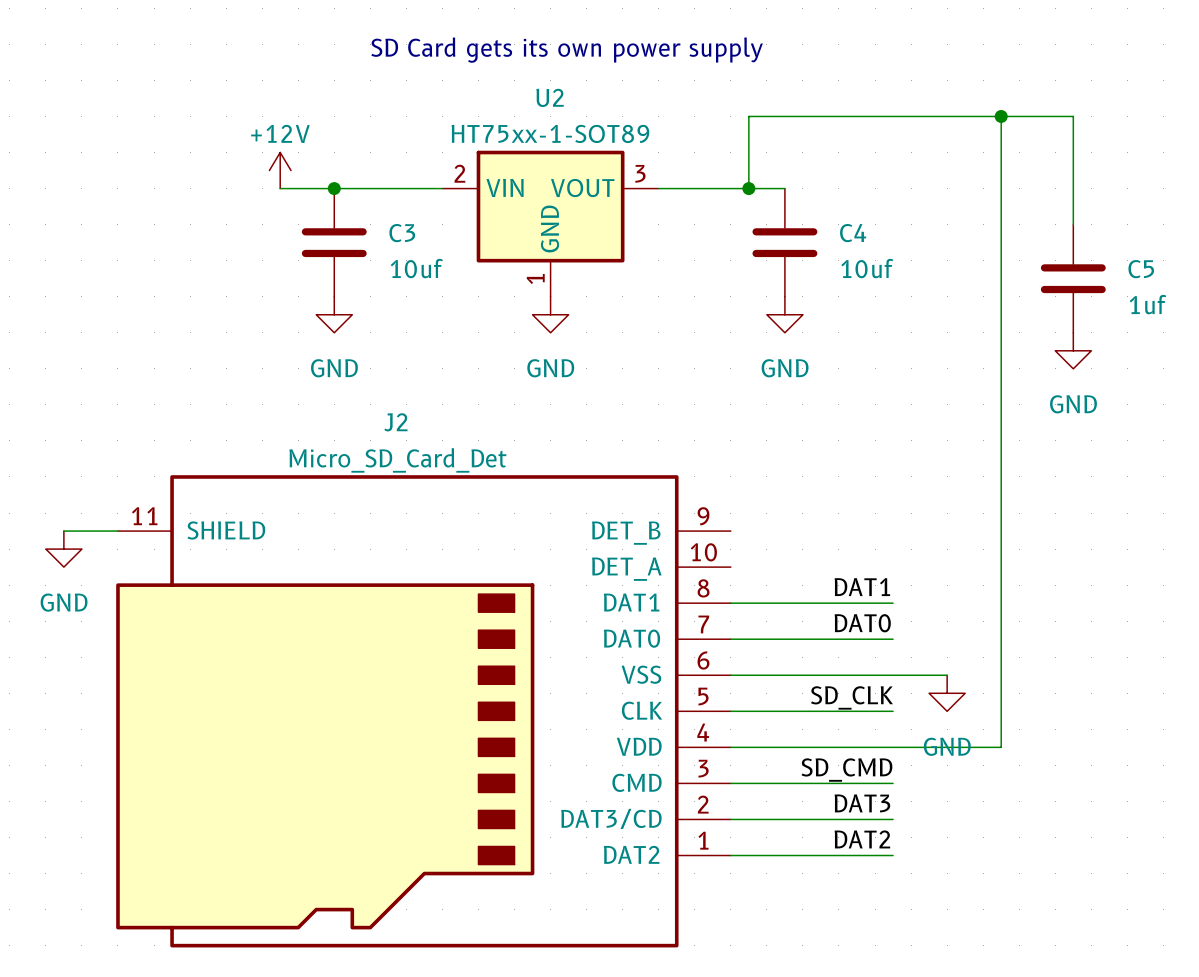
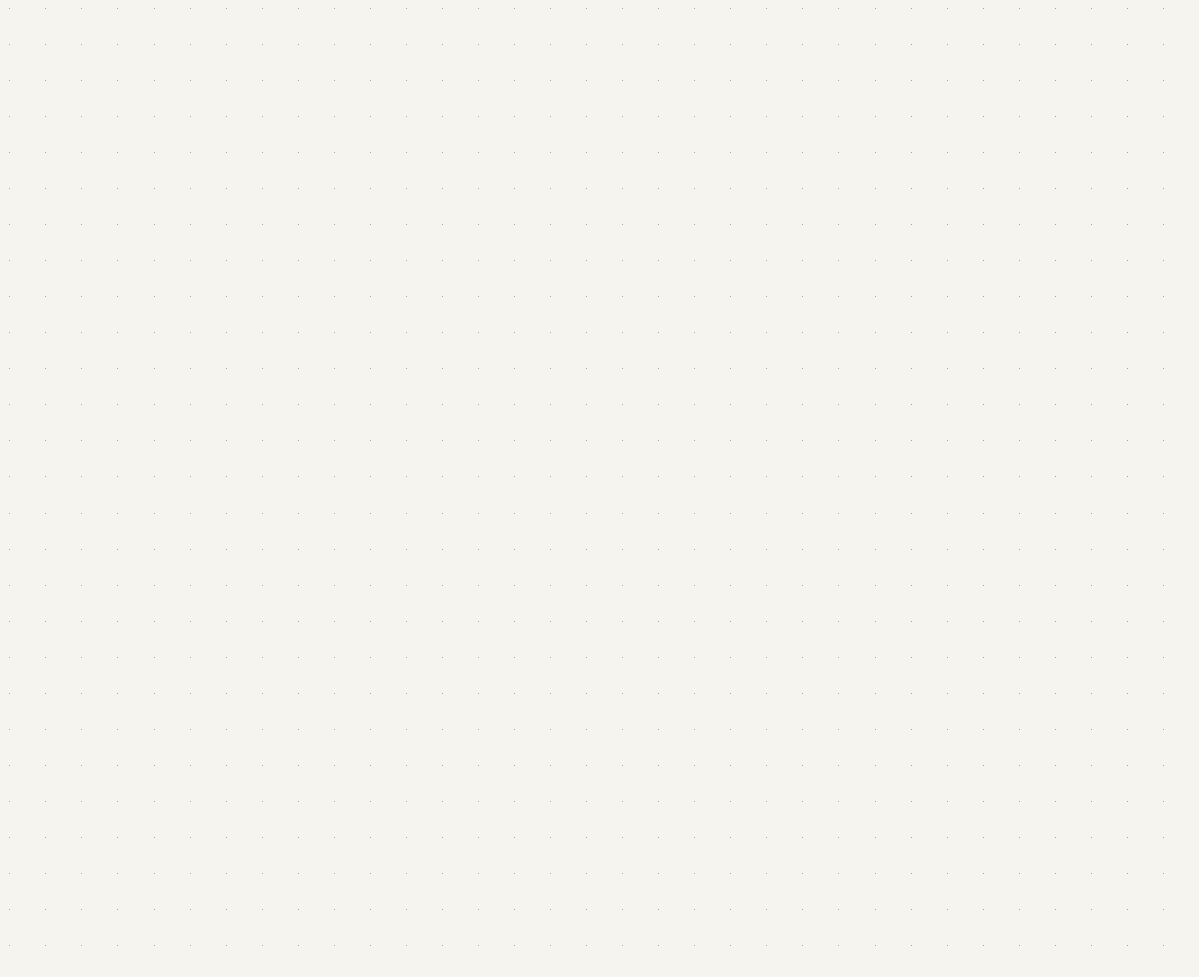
text: SD Card gets its own power supply (567, 50) -> none
wire: (1001, 116) (1001, 747) (730, 747) -> none
junction: (1001, 116) -> none
power symbol: +12V (280, 170) -> none
wire: (280, 188) (442, 188) -> none
junction: (334, 188) -> none
wire: (658, 188) (784, 188) -> none
wire: (748, 188) (748, 116) (1073, 116) (1073, 224) -> none
junction: (748, 188) -> none
U2: HT75xx-1-SOT89 (550, 223) -> none
C3: 10uf (334, 242) -> none
C4: 10uf (784, 242) -> none
C5: 1uf (1073, 278) -> none
power symbol: GND (334, 314) -> none
power symbol: GND (550, 314) -> none
power symbol: GND (784, 314) -> none
power symbol: GND (1073, 350) -> none
wire: (63, 531) (117, 531) -> none
power symbol: GND (63, 549) -> none
label: DAT1 (862, 587) -> none
wire: (730, 603) (893, 603) -> none
label: DAT0 (862, 623) -> none
wire: (730, 639) (893, 639) -> none
wire: (730, 675) (947, 675) -> none
power symbol: GND (947, 693) -> none
label: SD_CLK (851, 697) -> none
J2: Micro_SD_Card_Det (423, 711) -> none
wire: (730, 711) (893, 711) -> none
label: SD_CMD (846, 770) -> none
wire: (730, 783) (893, 783) -> none
label: DAT3 (862, 803) -> none
wire: (730, 819) (893, 819) -> none
label: DAT2 (862, 839) -> none
wire: (730, 855) (893, 855) -> none

